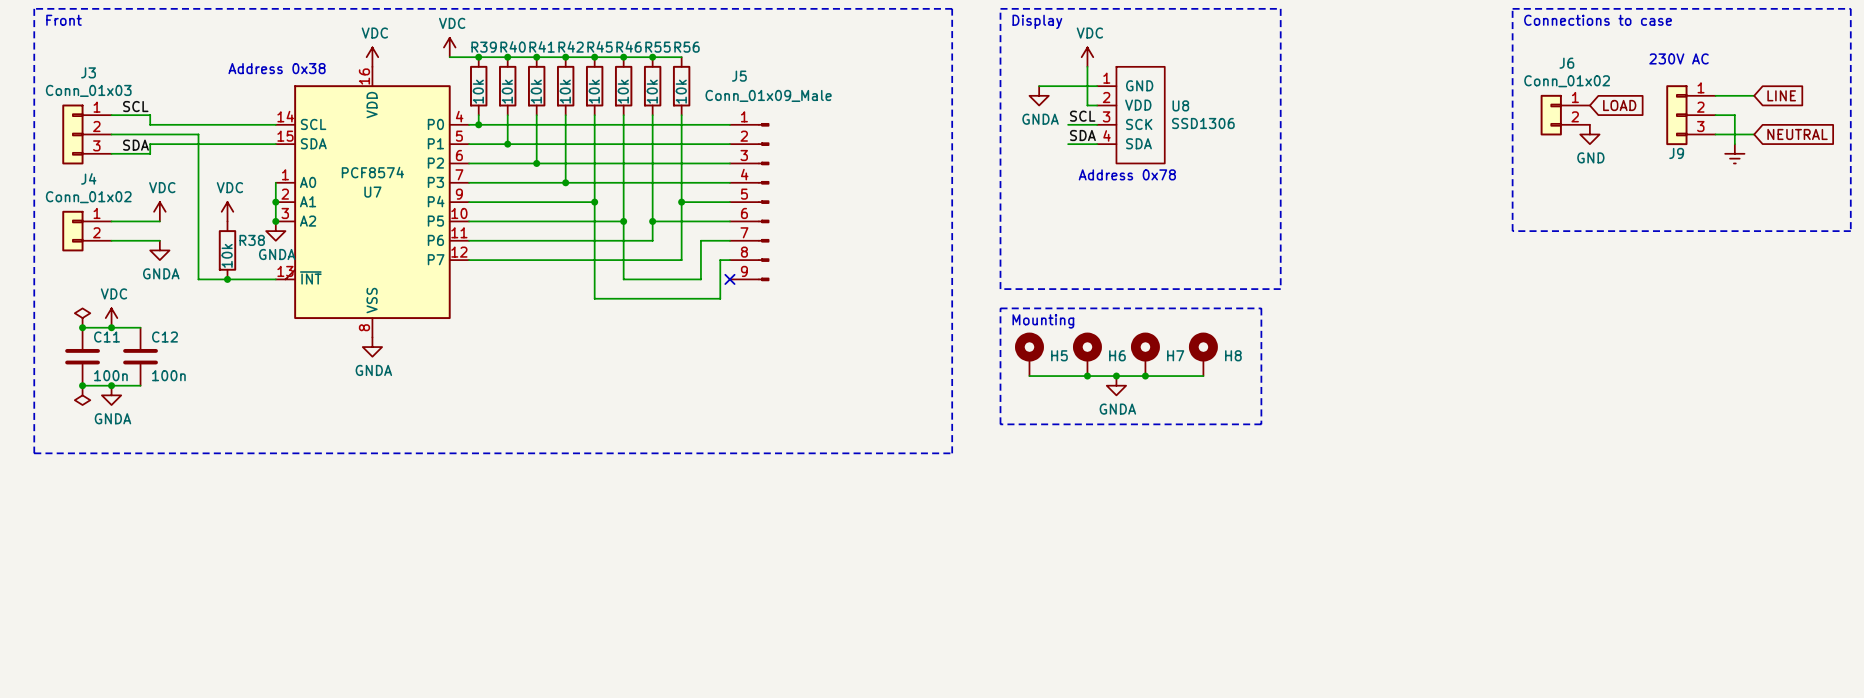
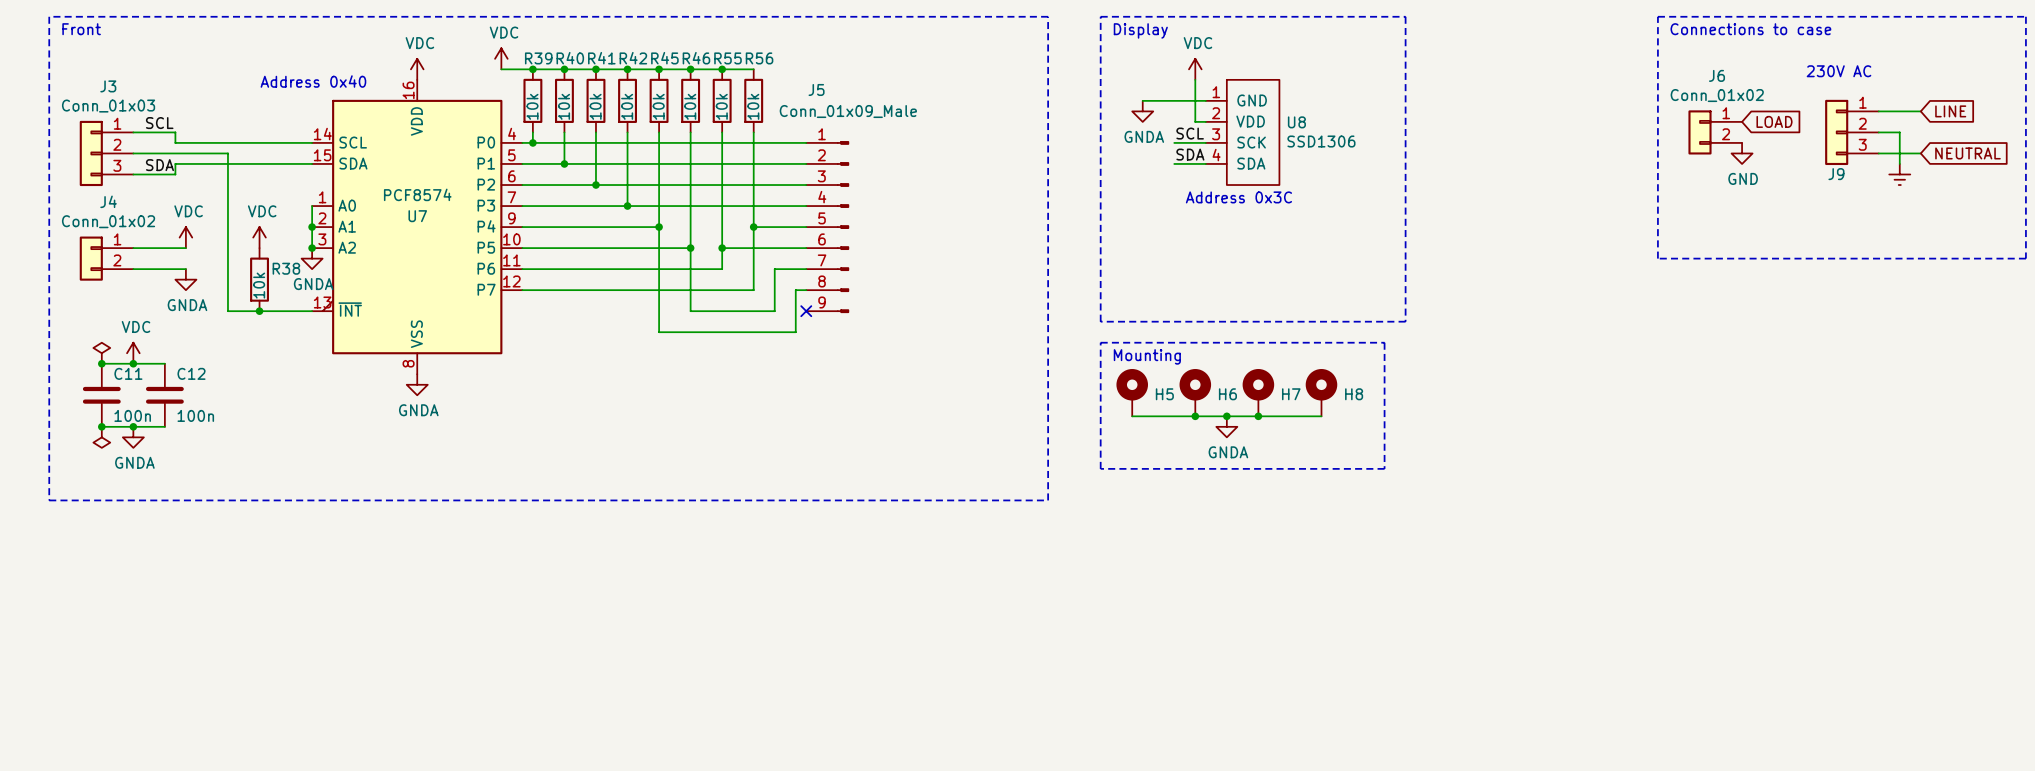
text: Address 0x38 (277, 68) -> Address 0x40 (313, 81)
text: Address 0x78 (1127, 174) -> Address 0x3C (1238, 197)

